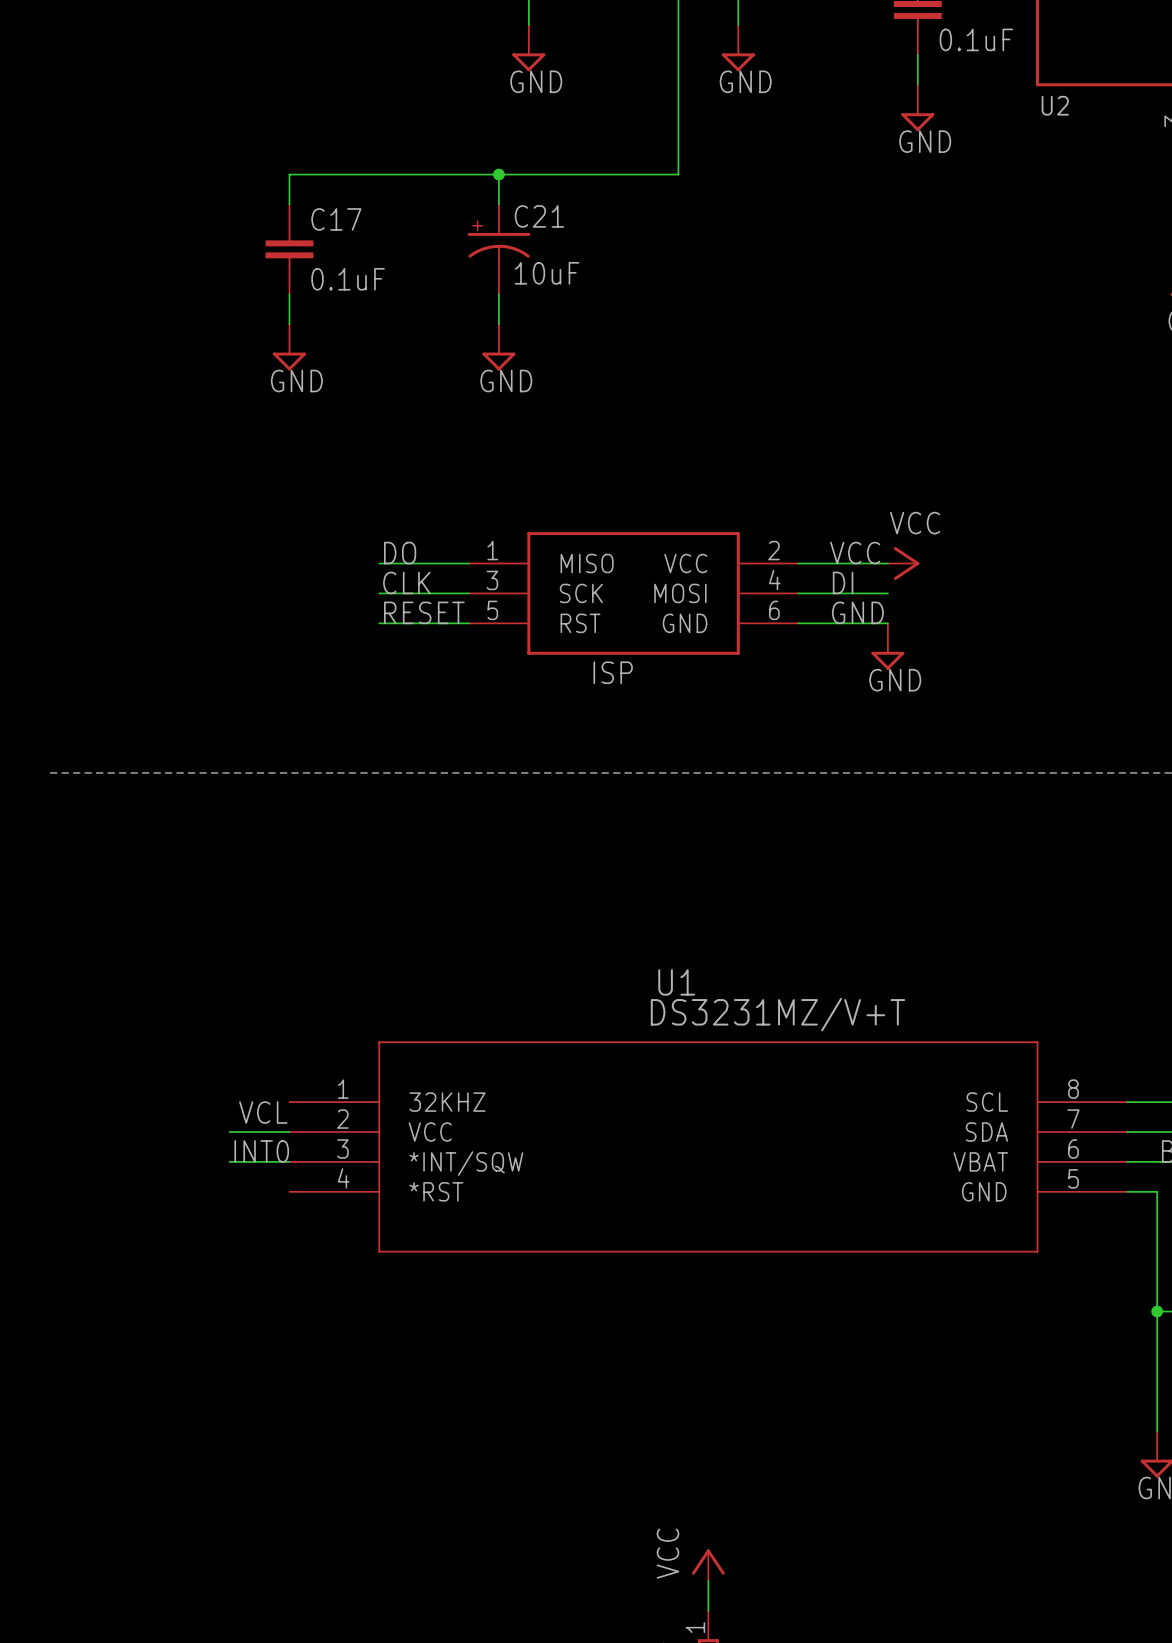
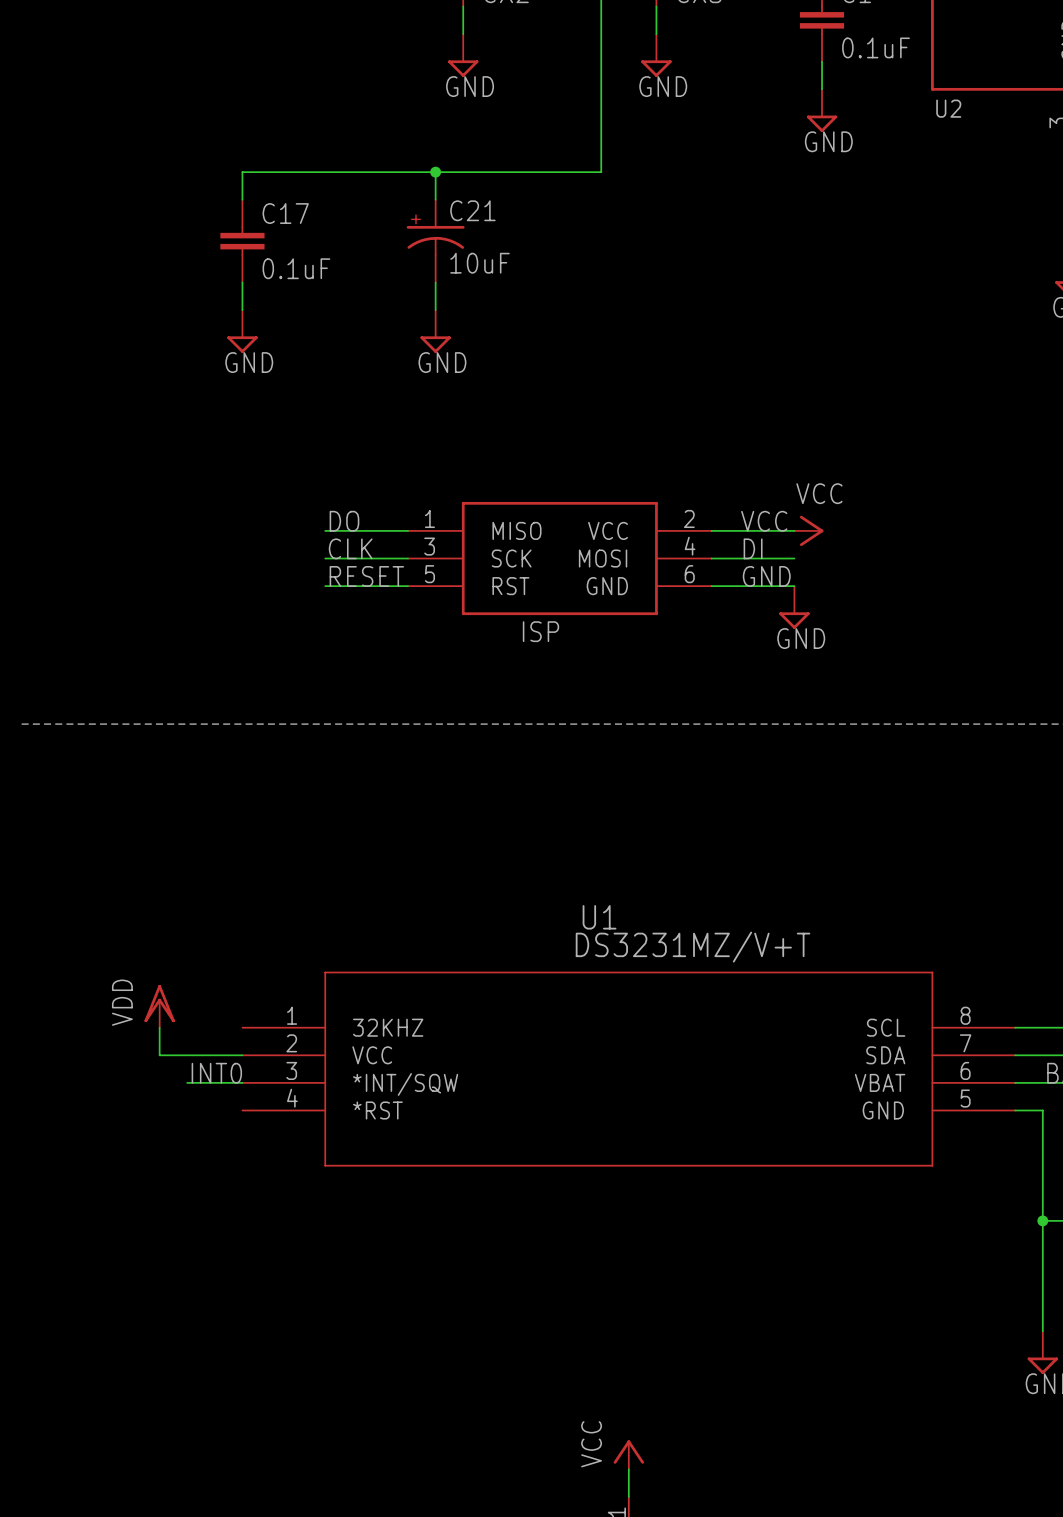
power symbol: none -> VDD (159, 1006)
wire: none -> (159, 1027) (159, 1055) (187, 1055)
label: VCL (263, 1112) -> none

